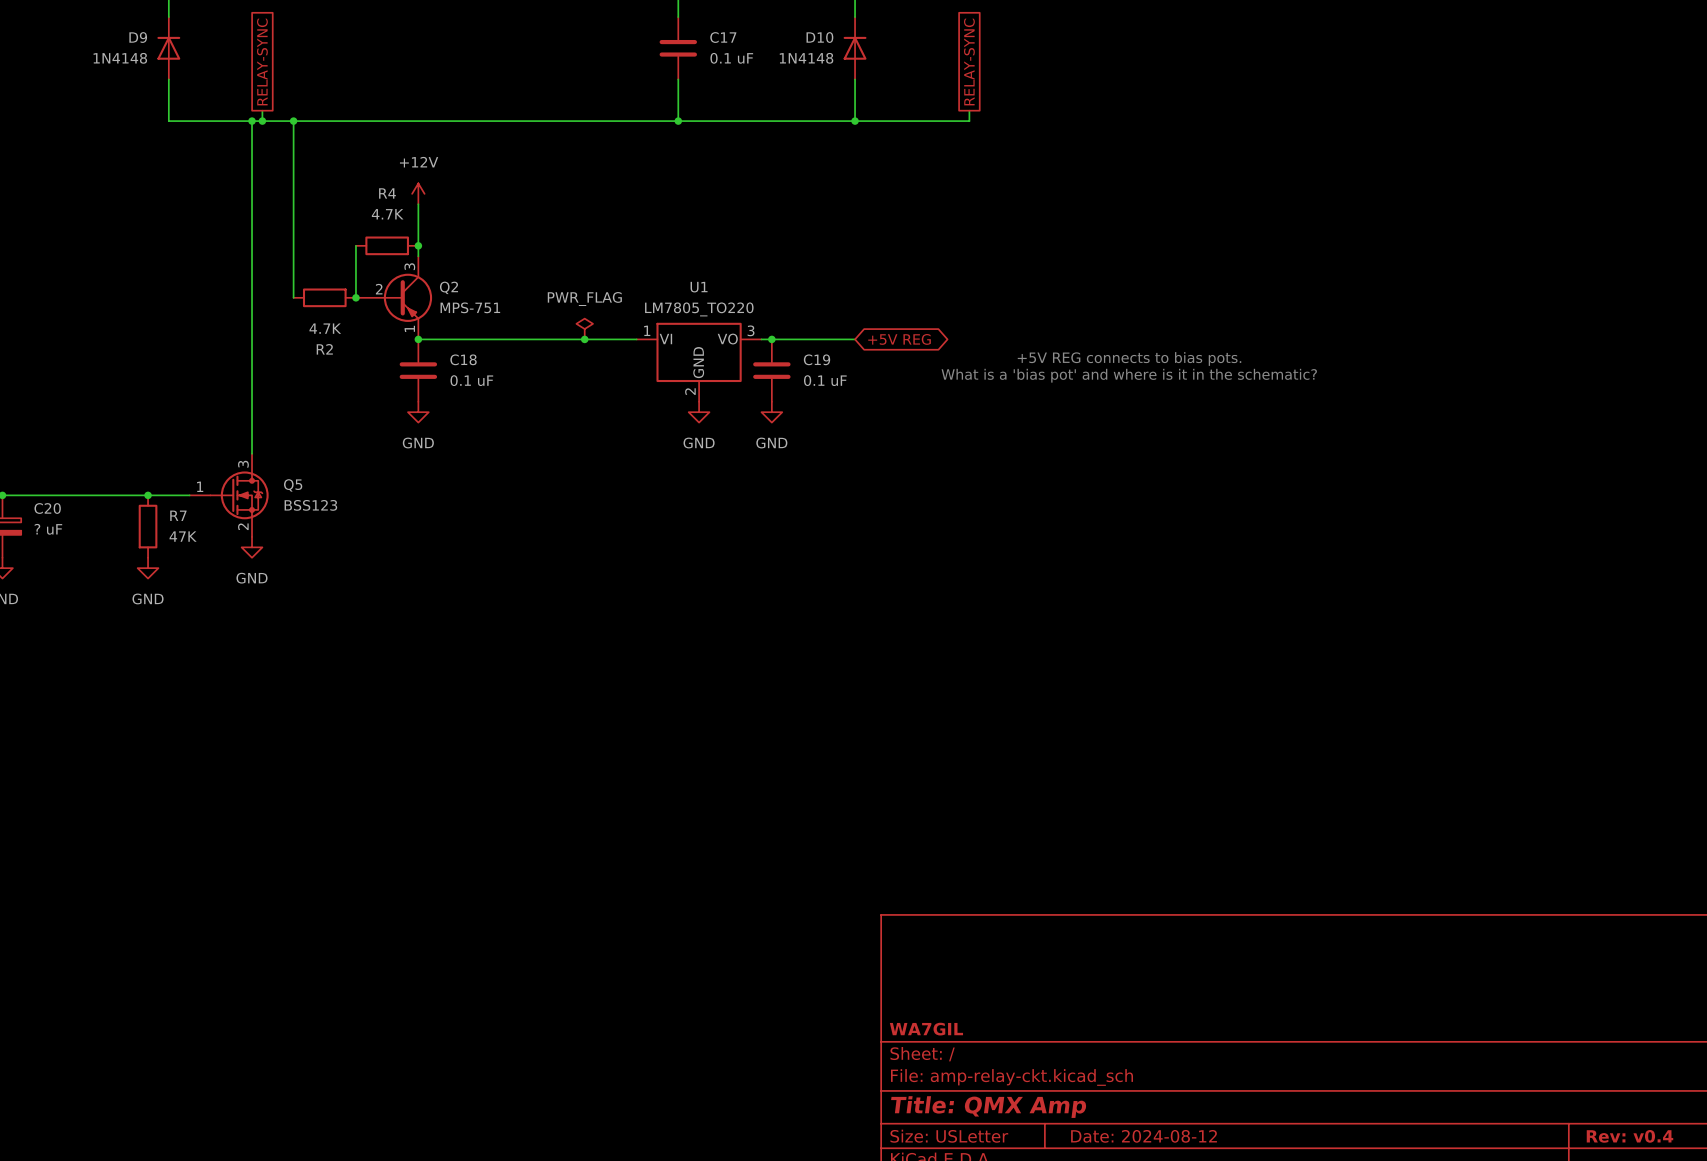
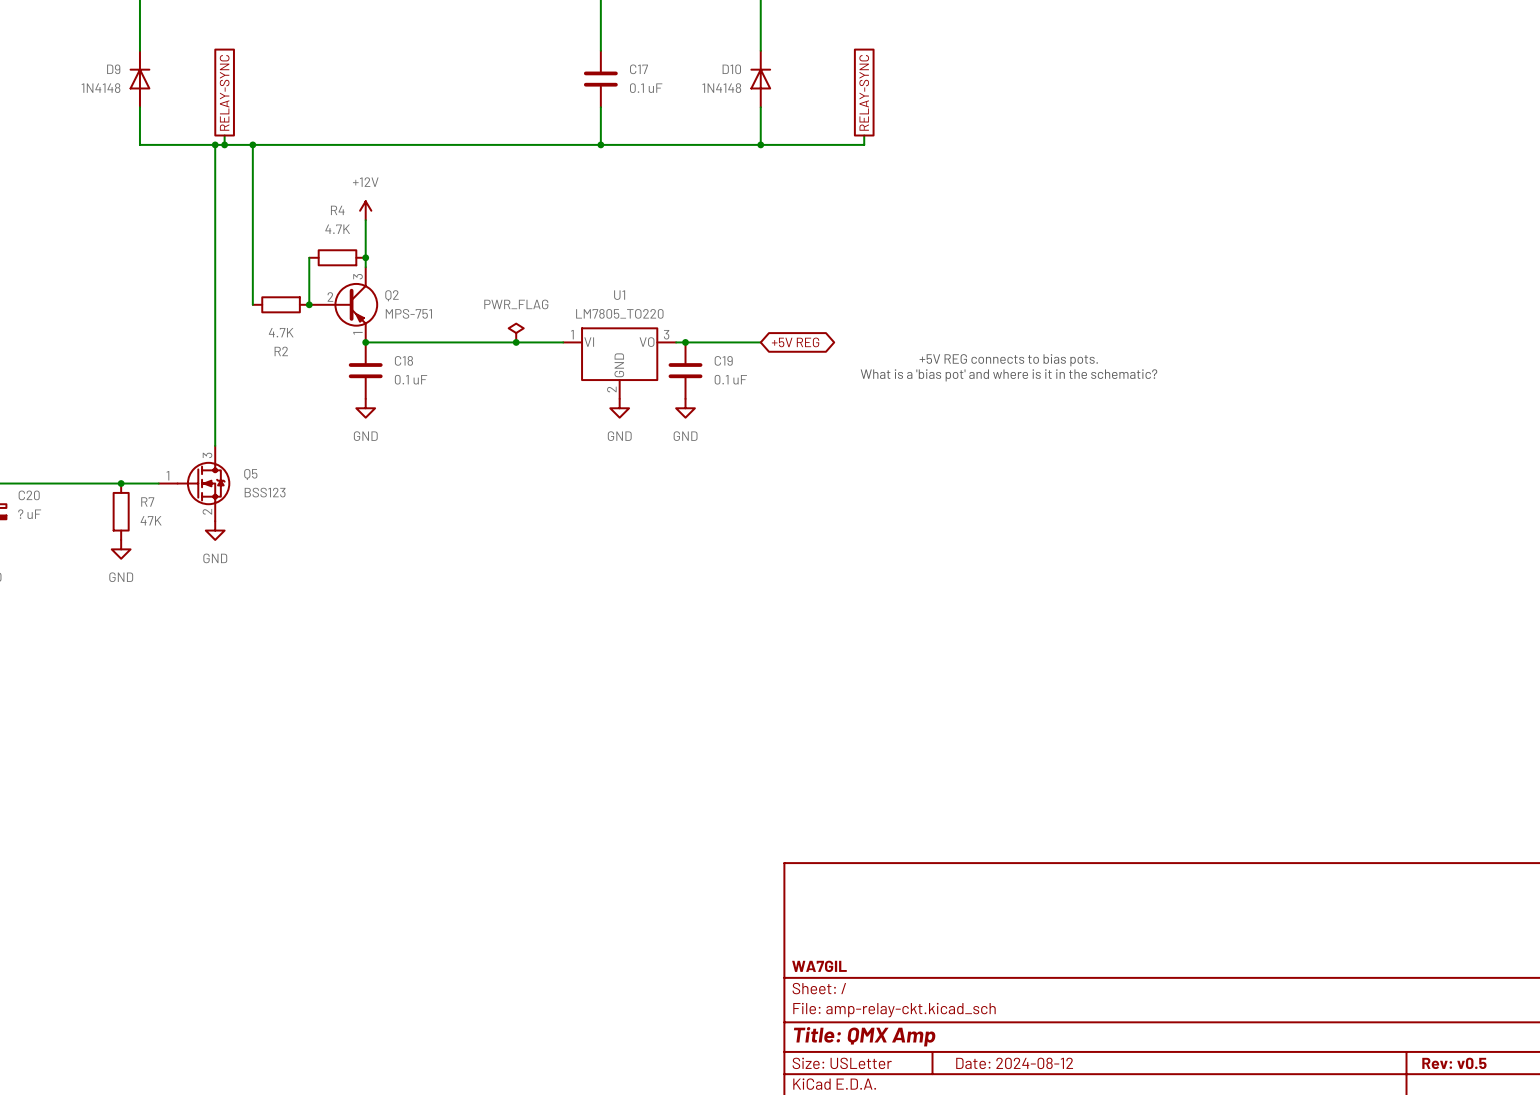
title block: Rev: v0.4 (1629, 1136) -> Rev: v0.5 (1454, 1063)

